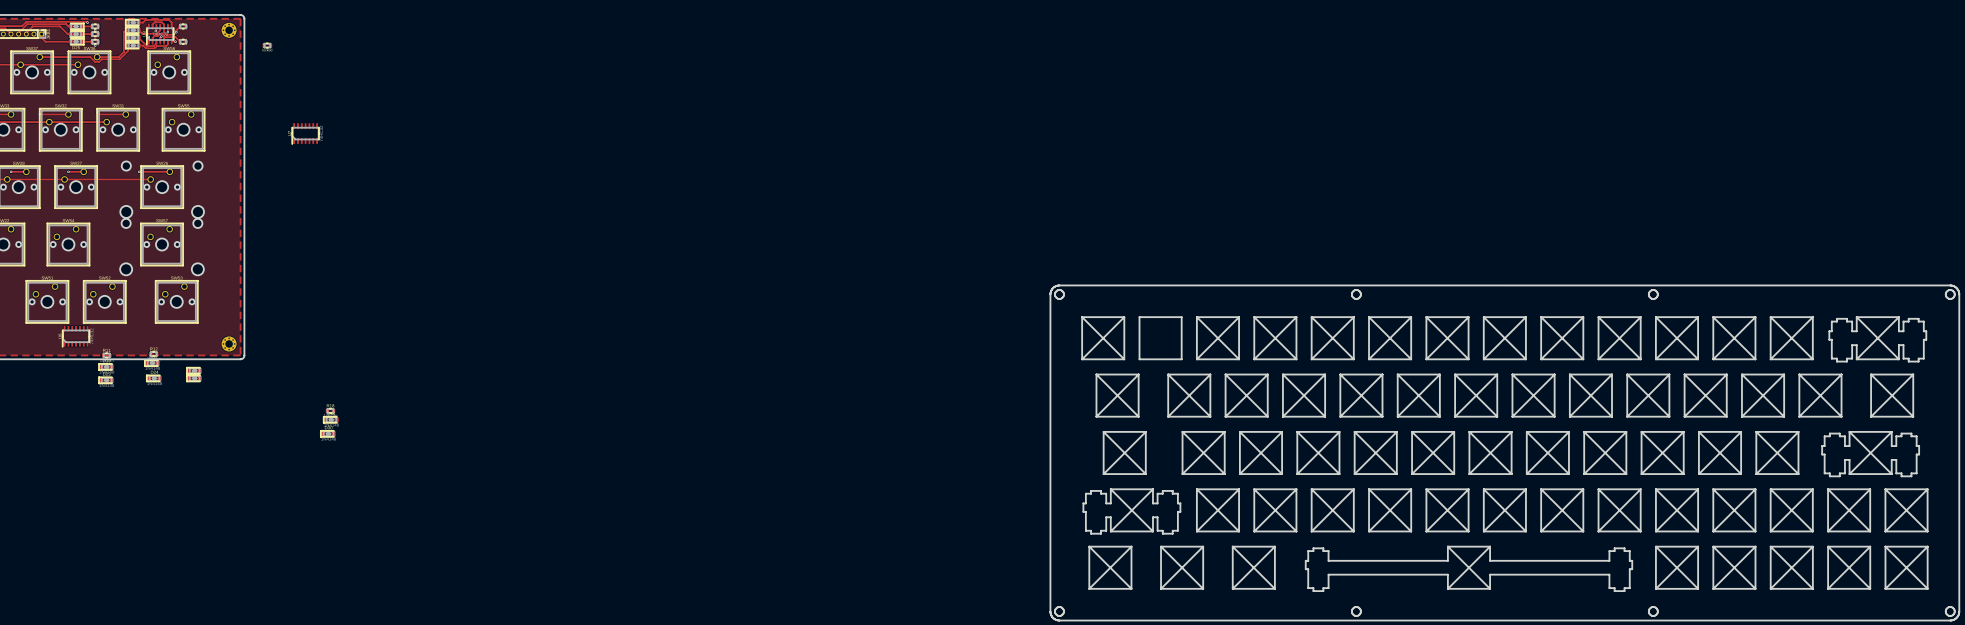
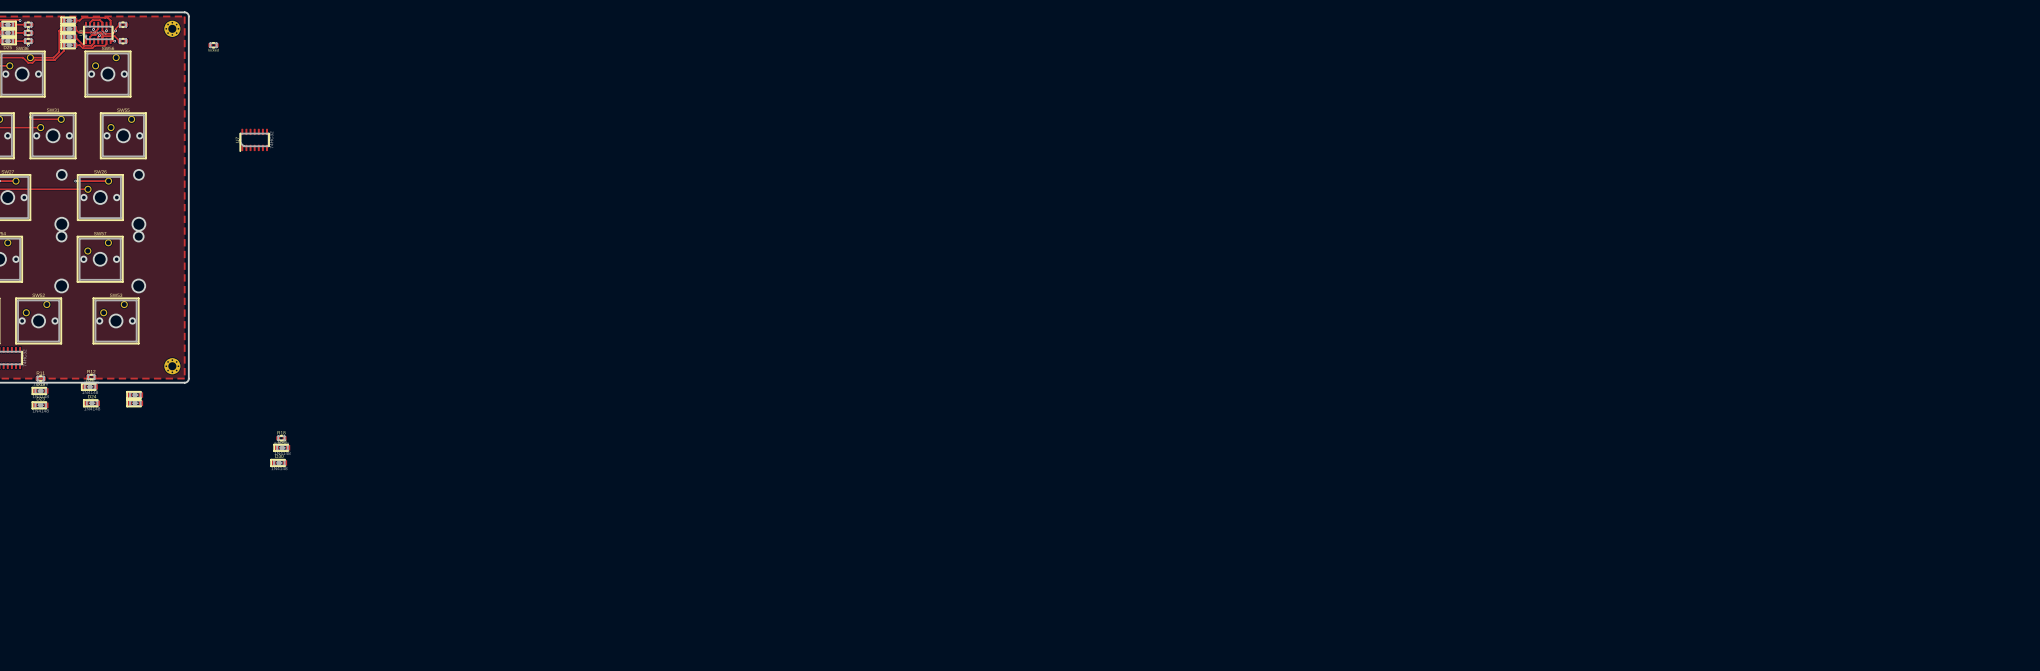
board edge: (1059, 285) (1053, 288) (1050, 294) (1050, 611) (1052, 616) (1056, 620) (1950, 620) (1955, 618) (1958, 614) (1959, 294) (1957, 289) (1953, 285) (1059, 285) -> none
board edge: (1059, 289) (1063, 294) (1059, 299) (1054, 294) (1059, 289) -> none
board edge: (1356, 289) (1351, 294) (1356, 299) (1360, 294) (1356, 289) -> none
board edge: (1653, 289) (1648, 294) (1653, 299) (1657, 294) (1653, 289) -> none
board edge: (1950, 289) (1945, 294) (1950, 299) (1954, 294) (1950, 289) -> none
board edge: (1082, 317) (1124, 317) -> none
board edge: (1082, 317) (1082, 359) -> none
board edge: (1082, 317) (1124, 359) -> none
board edge: (1124, 317) (1124, 359) -> none
board edge: (1124, 317) (1082, 359) -> none
board edge: (1139, 317) (1181, 317) (1181, 359) (1139, 359) (1139, 317) -> none
board edge: (1196, 317) (1239, 317) -> none
board edge: (1196, 317) (1196, 359) -> none
board edge: (1196, 317) (1239, 359) -> none
board edge: (1239, 317) (1239, 359) -> none
board edge: (1239, 317) (1196, 359) -> none
board edge: (1254, 317) (1296, 317) -> none
board edge: (1254, 317) (1254, 359) -> none
board edge: (1254, 317) (1296, 359) -> none
board edge: (1296, 317) (1296, 359) -> none
board edge: (1296, 317) (1254, 359) -> none
board edge: (1311, 317) (1353, 317) -> none
board edge: (1311, 317) (1311, 359) -> none
board edge: (1311, 317) (1353, 359) -> none
board edge: (1353, 317) (1353, 359) -> none
board edge: (1353, 317) (1311, 359) -> none
board edge: (1369, 317) (1411, 317) -> none
board edge: (1369, 317) (1369, 359) -> none
board edge: (1369, 317) (1411, 359) -> none
board edge: (1411, 317) (1411, 359) -> none
board edge: (1411, 317) (1369, 359) -> none
board edge: (1426, 317) (1468, 317) -> none
board edge: (1426, 317) (1426, 359) -> none
board edge: (1426, 317) (1468, 359) -> none
board edge: (1468, 317) (1468, 359) -> none
board edge: (1468, 317) (1426, 359) -> none
board edge: (1483, 317) (1525, 317) -> none
board edge: (1483, 317) (1483, 359) -> none
board edge: (1483, 317) (1525, 359) -> none
board edge: (1525, 317) (1525, 359) -> none
board edge: (1525, 317) (1483, 359) -> none
board edge: (1541, 317) (1583, 317) -> none
board edge: (1541, 317) (1541, 359) -> none
board edge: (1541, 317) (1583, 359) -> none
board edge: (1583, 317) (1583, 359) -> none
board edge: (1583, 317) (1541, 359) -> none
board edge: (1598, 317) (1598, 359) -> none
board edge: (1598, 317) (1640, 317) -> none
board edge: (1598, 317) (1640, 359) -> none
board edge: (1640, 317) (1640, 359) -> none
board edge: (1640, 317) (1598, 359) -> none
board edge: (1655, 317) (1698, 317) -> none
board edge: (1655, 317) (1655, 359) -> none
board edge: (1655, 317) (1698, 359) -> none
board edge: (1698, 317) (1698, 359) -> none
board edge: (1698, 317) (1655, 359) -> none
board edge: (1713, 317) (1713, 359) -> none
board edge: (1713, 317) (1755, 317) -> none
board edge: (1713, 317) (1755, 359) -> none
board edge: (1755, 317) (1755, 359) -> none
board edge: (1755, 317) (1713, 359) -> none
board edge: (1770, 317) (1770, 359) -> none
board edge: (1770, 317) (1812, 317) -> none
board edge: (1770, 317) (1812, 359) -> none
board edge: (1812, 317) (1812, 359) -> none
board edge: (1812, 317) (1770, 359) -> none
board edge: (1856, 317) (1898, 317) -> none
board edge: (1856, 317) (1856, 331) (1852, 331) (1852, 321) (1846, 321) (1846, 318) (1837, 318) (1837, 321) (1831, 321) (1831, 331) (1829, 331) (1829, 339) (1831, 339) (1831, 358) (1837, 358) (1837, 361) (1846, 361) (1846, 358) (1852, 358) (1852, 345) (1856, 345) (1856, 359) -> none
board edge: (1856, 317) (1898, 359) -> none
board edge: (1898, 317) (1898, 331) (1903, 331) (1903, 321) (1908, 321) (1908, 318) (1918, 318) (1918, 321) (1923, 321) (1923, 331) (1926, 331) (1926, 339) (1923, 339) (1923, 358) (1918, 358) (1918, 361) (1908, 361) (1908, 358) (1903, 358) (1903, 345) (1898, 345) (1898, 359) -> none
board edge: (1898, 317) (1856, 359) -> none
board edge: (1082, 359) (1124, 359) -> none
board edge: (1196, 359) (1239, 359) -> none
board edge: (1254, 359) (1296, 359) -> none
board edge: (1311, 359) (1353, 359) -> none
board edge: (1369, 359) (1411, 359) -> none
board edge: (1426, 359) (1468, 359) -> none
board edge: (1483, 359) (1525, 359) -> none
board edge: (1541, 359) (1583, 359) -> none
board edge: (1598, 359) (1640, 359) -> none
board edge: (1655, 359) (1698, 359) -> none
board edge: (1713, 359) (1755, 359) -> none
board edge: (1770, 359) (1812, 359) -> none
board edge: (1856, 359) (1898, 359) -> none
board edge: (1096, 374) (1138, 374) -> none
board edge: (1096, 374) (1096, 416) -> none
board edge: (1096, 374) (1138, 416) -> none
board edge: (1138, 374) (1138, 416) -> none
board edge: (1138, 374) (1096, 416) -> none
board edge: (1168, 374) (1210, 374) -> none
board edge: (1168, 374) (1168, 416) -> none
board edge: (1168, 374) (1210, 416) -> none
board edge: (1210, 374) (1210, 416) -> none
board edge: (1210, 374) (1168, 416) -> none
board edge: (1225, 374) (1267, 374) -> none
board edge: (1225, 374) (1225, 416) -> none
board edge: (1225, 374) (1267, 416) -> none
board edge: (1267, 374) (1267, 416) -> none
board edge: (1267, 374) (1225, 416) -> none
board edge: (1282, 374) (1325, 374) -> none
board edge: (1282, 374) (1282, 416) -> none
board edge: (1282, 374) (1325, 416) -> none
board edge: (1325, 374) (1325, 416) -> none
board edge: (1325, 374) (1282, 416) -> none
board edge: (1340, 374) (1382, 374) -> none
board edge: (1340, 374) (1340, 416) -> none
board edge: (1340, 374) (1382, 416) -> none
board edge: (1382, 374) (1382, 416) -> none
board edge: (1382, 374) (1340, 416) -> none
board edge: (1397, 374) (1439, 374) -> none
board edge: (1397, 374) (1397, 416) -> none
board edge: (1397, 374) (1439, 416) -> none
board edge: (1439, 374) (1439, 416) -> none
board edge: (1439, 374) (1397, 416) -> none
board edge: (1455, 374) (1497, 374) -> none
board edge: (1455, 374) (1455, 416) -> none
board edge: (1455, 374) (1497, 416) -> none
board edge: (1497, 374) (1497, 416) -> none
board edge: (1497, 374) (1455, 416) -> none
board edge: (1512, 374) (1554, 374) -> none
board edge: (1512, 374) (1512, 416) -> none
board edge: (1512, 374) (1554, 416) -> none
board edge: (1554, 374) (1554, 416) -> none
board edge: (1554, 374) (1512, 416) -> none
board edge: (1569, 374) (1612, 374) -> none
board edge: (1569, 374) (1569, 416) -> none
board edge: (1569, 374) (1612, 416) -> none
board edge: (1612, 374) (1612, 416) -> none
board edge: (1612, 374) (1569, 416) -> none
board edge: (1627, 374) (1669, 374) -> none
board edge: (1627, 374) (1627, 416) -> none
board edge: (1627, 374) (1669, 416) -> none
board edge: (1669, 374) (1669, 416) -> none
board edge: (1669, 374) (1627, 416) -> none
board edge: (1684, 374) (1726, 374) -> none
board edge: (1684, 374) (1684, 416) -> none
board edge: (1684, 374) (1726, 416) -> none
board edge: (1726, 374) (1726, 416) -> none
board edge: (1726, 374) (1684, 416) -> none
board edge: (1741, 374) (1784, 374) -> none
board edge: (1741, 374) (1741, 416) -> none
board edge: (1741, 374) (1784, 416) -> none
board edge: (1784, 374) (1784, 416) -> none
board edge: (1784, 374) (1741, 416) -> none
board edge: (1799, 374) (1841, 374) -> none
board edge: (1799, 374) (1799, 416) -> none
board edge: (1799, 374) (1841, 416) -> none
board edge: (1841, 374) (1841, 416) -> none
board edge: (1841, 374) (1799, 416) -> none
board edge: (1871, 374) (1913, 374) -> none
board edge: (1871, 374) (1871, 416) -> none
board edge: (1871, 374) (1913, 416) -> none
board edge: (1913, 374) (1913, 416) -> none
board edge: (1913, 374) (1871, 416) -> none
board edge: (1096, 416) (1138, 416) -> none
board edge: (1168, 416) (1210, 416) -> none
board edge: (1225, 416) (1267, 416) -> none
board edge: (1282, 416) (1325, 416) -> none
board edge: (1340, 416) (1382, 416) -> none
board edge: (1397, 416) (1439, 416) -> none
board edge: (1455, 416) (1497, 416) -> none
board edge: (1512, 416) (1554, 416) -> none
board edge: (1569, 416) (1612, 416) -> none
board edge: (1627, 416) (1669, 416) -> none
board edge: (1684, 416) (1726, 416) -> none
board edge: (1741, 416) (1784, 416) -> none
board edge: (1799, 416) (1841, 416) -> none
board edge: (1871, 416) (1913, 416) -> none
board edge: (1103, 431) (1145, 431) -> none
board edge: (1103, 431) (1103, 474) -> none
board edge: (1103, 431) (1145, 474) -> none
board edge: (1145, 431) (1145, 474) -> none
board edge: (1145, 431) (1103, 474) -> none
board edge: (1182, 431) (1224, 431) -> none
board edge: (1182, 431) (1182, 474) -> none
board edge: (1182, 431) (1224, 474) -> none
board edge: (1224, 431) (1224, 474) -> none
board edge: (1224, 431) (1182, 474) -> none
board edge: (1239, 431) (1282, 431) -> none
board edge: (1239, 431) (1239, 474) -> none
board edge: (1239, 431) (1282, 474) -> none
board edge: (1282, 431) (1282, 474) -> none
board edge: (1282, 431) (1239, 474) -> none
board edge: (1297, 431) (1339, 431) -> none
board edge: (1297, 431) (1297, 474) -> none
board edge: (1297, 431) (1339, 474) -> none
board edge: (1339, 431) (1339, 474) -> none
board edge: (1339, 431) (1297, 474) -> none
board edge: (1354, 431) (1396, 431) -> none
board edge: (1354, 431) (1354, 474) -> none
board edge: (1354, 431) (1396, 474) -> none
board edge: (1396, 431) (1396, 474) -> none
board edge: (1396, 431) (1354, 474) -> none
board edge: (1412, 431) (1454, 431) -> none
board edge: (1412, 431) (1412, 474) -> none
board edge: (1412, 431) (1454, 474) -> none
board edge: (1454, 431) (1454, 474) -> none
board edge: (1454, 431) (1412, 474) -> none
board edge: (1469, 431) (1511, 431) -> none
board edge: (1469, 431) (1469, 474) -> none
board edge: (1469, 431) (1511, 474) -> none
board edge: (1511, 431) (1511, 474) -> none
board edge: (1511, 431) (1469, 474) -> none
board edge: (1526, 431) (1568, 431) -> none
board edge: (1526, 431) (1526, 474) -> none
board edge: (1526, 431) (1568, 474) -> none
board edge: (1568, 431) (1568, 474) -> none
board edge: (1568, 431) (1526, 474) -> none
board edge: (1584, 431) (1626, 431) -> none
board edge: (1584, 431) (1584, 474) -> none
board edge: (1584, 431) (1626, 474) -> none
board edge: (1626, 431) (1626, 474) -> none
board edge: (1626, 431) (1584, 474) -> none
board edge: (1641, 431) (1683, 431) -> none
board edge: (1641, 431) (1641, 474) -> none
board edge: (1641, 431) (1683, 474) -> none
board edge: (1683, 431) (1683, 474) -> none
board edge: (1683, 431) (1641, 474) -> none
board edge: (1698, 431) (1741, 431) -> none
board edge: (1698, 431) (1698, 474) -> none
board edge: (1698, 431) (1741, 474) -> none
board edge: (1741, 431) (1741, 474) -> none
board edge: (1741, 431) (1698, 474) -> none
board edge: (1756, 431) (1798, 431) -> none
board edge: (1756, 431) (1756, 474) -> none
board edge: (1756, 431) (1798, 474) -> none
board edge: (1798, 431) (1798, 474) -> none
board edge: (1798, 431) (1756, 474) -> none
board edge: (1849, 431) (1891, 431) -> none
board edge: (1849, 431) (1849, 446) (1844, 446) (1844, 436) (1839, 436) (1839, 433) (1829, 433) (1829, 436) (1824, 436) (1824, 446) (1822, 446) (1822, 454) (1824, 454) (1824, 473) (1829, 473) (1829, 476) (1839, 476) (1839, 473) (1844, 473) (1844, 459) (1849, 459) (1849, 474) -> none
board edge: (1849, 431) (1891, 474) -> none
board edge: (1891, 431) (1891, 446) (1896, 446) (1896, 436) (1901, 436) (1901, 433) (1911, 433) (1911, 436) (1916, 436) (1916, 446) (1919, 446) (1919, 454) (1916, 454) (1916, 473) (1911, 473) (1911, 476) (1901, 476) (1901, 473) (1896, 473) (1896, 459) (1891, 459) (1891, 474) -> none
board edge: (1891, 431) (1849, 474) -> none
board edge: (1103, 474) (1145, 474) -> none
board edge: (1182, 474) (1224, 474) -> none
board edge: (1239, 474) (1282, 474) -> none
board edge: (1297, 474) (1339, 474) -> none
board edge: (1354, 474) (1396, 474) -> none
board edge: (1412, 474) (1454, 474) -> none
board edge: (1469, 474) (1511, 474) -> none
board edge: (1526, 474) (1568, 474) -> none
board edge: (1584, 474) (1626, 474) -> none
board edge: (1641, 474) (1683, 474) -> none
board edge: (1698, 474) (1741, 474) -> none
board edge: (1756, 474) (1798, 474) -> none
board edge: (1849, 474) (1891, 474) -> none
board edge: (1110, 489) (1152, 489) -> none
board edge: (1110, 489) (1110, 503) (1106, 503) (1106, 493) (1101, 493) (1101, 490) (1091, 490) (1091, 493) (1085, 493) (1085, 503) (1083, 503) (1083, 511) (1085, 511) (1085, 530) (1091, 530) (1091, 533) (1101, 533) (1101, 530) (1106, 530) (1106, 517) (1110, 517) (1110, 531) -> none
board edge: (1110, 489) (1152, 531) -> none
board edge: (1152, 489) (1152, 503) (1157, 503) (1157, 493) (1162, 493) (1162, 490) (1172, 490) (1172, 493) (1177, 493) (1177, 503) (1180, 503) (1180, 511) (1177, 511) (1177, 530) (1172, 530) (1172, 533) (1162, 533) (1162, 530) (1157, 530) (1157, 517) (1152, 517) (1152, 531) -> none
board edge: (1152, 489) (1110, 531) -> none
board edge: (1196, 489) (1239, 489) -> none
board edge: (1196, 489) (1196, 531) -> none
board edge: (1196, 489) (1239, 531) -> none
board edge: (1239, 489) (1239, 531) -> none
board edge: (1239, 489) (1196, 531) -> none
board edge: (1254, 489) (1296, 489) -> none
board edge: (1254, 489) (1254, 531) -> none
board edge: (1254, 489) (1296, 531) -> none
board edge: (1296, 489) (1296, 531) -> none
board edge: (1296, 489) (1254, 531) -> none
board edge: (1311, 489) (1353, 489) -> none
board edge: (1311, 489) (1311, 531) -> none
board edge: (1311, 489) (1353, 531) -> none
board edge: (1353, 489) (1353, 531) -> none
board edge: (1353, 489) (1311, 531) -> none
board edge: (1369, 489) (1411, 489) -> none
board edge: (1369, 489) (1369, 531) -> none
board edge: (1369, 489) (1411, 531) -> none
board edge: (1411, 489) (1411, 531) -> none
board edge: (1411, 489) (1369, 531) -> none
board edge: (1426, 489) (1468, 489) -> none
board edge: (1426, 489) (1426, 531) -> none
board edge: (1426, 489) (1468, 531) -> none
board edge: (1468, 489) (1468, 531) -> none
board edge: (1468, 489) (1426, 531) -> none
board edge: (1483, 489) (1525, 489) -> none
board edge: (1483, 489) (1483, 531) -> none
board edge: (1483, 489) (1525, 531) -> none
board edge: (1525, 489) (1525, 531) -> none
board edge: (1525, 489) (1483, 531) -> none
board edge: (1541, 489) (1583, 489) -> none
board edge: (1541, 489) (1541, 531) -> none
board edge: (1541, 489) (1583, 531) -> none
board edge: (1583, 489) (1583, 531) -> none
board edge: (1583, 489) (1541, 531) -> none
board edge: (1598, 489) (1598, 531) -> none
board edge: (1598, 489) (1640, 489) -> none
board edge: (1598, 489) (1640, 531) -> none
board edge: (1640, 489) (1640, 531) -> none
board edge: (1640, 489) (1598, 531) -> none
board edge: (1655, 489) (1655, 531) -> none
board edge: (1655, 489) (1698, 489) -> none
board edge: (1655, 489) (1698, 531) -> none
board edge: (1698, 489) (1698, 531) -> none
board edge: (1698, 489) (1655, 531) -> none
board edge: (1713, 489) (1713, 531) -> none
board edge: (1713, 489) (1755, 489) -> none
board edge: (1713, 489) (1755, 531) -> none
board edge: (1755, 489) (1755, 531) -> none
board edge: (1755, 489) (1713, 531) -> none
board edge: (1770, 489) (1770, 531) -> none
board edge: (1770, 489) (1812, 489) -> none
board edge: (1770, 489) (1812, 531) -> none
board edge: (1812, 489) (1812, 531) -> none
board edge: (1812, 489) (1770, 531) -> none
board edge: (1828, 489) (1870, 489) -> none
board edge: (1828, 489) (1828, 531) -> none
board edge: (1828, 489) (1870, 531) -> none
board edge: (1870, 489) (1870, 531) -> none
board edge: (1870, 489) (1828, 531) -> none
board edge: (1885, 489) (1927, 489) -> none
board edge: (1885, 489) (1885, 531) -> none
board edge: (1885, 489) (1927, 531) -> none
board edge: (1927, 489) (1927, 531) -> none
board edge: (1927, 489) (1885, 531) -> none
board edge: (1110, 531) (1152, 531) -> none
board edge: (1196, 531) (1239, 531) -> none
board edge: (1254, 531) (1296, 531) -> none
board edge: (1311, 531) (1353, 531) -> none
board edge: (1369, 531) (1411, 531) -> none
board edge: (1426, 531) (1468, 531) -> none
board edge: (1483, 531) (1525, 531) -> none
board edge: (1541, 531) (1583, 531) -> none
board edge: (1598, 531) (1640, 531) -> none
board edge: (1655, 531) (1698, 531) -> none
board edge: (1713, 531) (1755, 531) -> none
board edge: (1770, 531) (1812, 531) -> none
board edge: (1828, 531) (1870, 531) -> none
board edge: (1885, 531) (1927, 531) -> none
board edge: (1089, 546) (1131, 546) -> none
board edge: (1089, 546) (1089, 588) -> none
board edge: (1089, 546) (1131, 588) -> none
board edge: (1131, 546) (1131, 588) -> none
board edge: (1131, 546) (1089, 588) -> none
board edge: (1161, 546) (1203, 546) -> none
board edge: (1161, 546) (1161, 588) -> none
board edge: (1161, 546) (1203, 588) -> none
board edge: (1203, 546) (1203, 588) -> none
board edge: (1203, 546) (1161, 588) -> none
board edge: (1232, 546) (1274, 546) -> none
board edge: (1232, 546) (1232, 588) -> none
board edge: (1232, 546) (1274, 588) -> none
board edge: (1274, 546) (1274, 588) -> none
board edge: (1274, 546) (1232, 588) -> none
board edge: (1447, 546) (1490, 546) -> none
board edge: (1447, 546) (1447, 560) (1328, 560) (1328, 551) (1323, 551) (1323, 548) (1313, 548) (1313, 551) (1308, 551) (1308, 560) (1305, 560) (1305, 569) (1308, 569) (1308, 588) (1313, 588) (1313, 591) (1323, 591) (1323, 588) (1328, 588) (1328, 574) (1447, 574) (1447, 588) -> none
board edge: (1447, 546) (1490, 588) -> none
board edge: (1490, 546) (1490, 560) (1609, 560) (1609, 551) (1614, 551) (1614, 548) (1624, 548) (1624, 551) (1629, 551) (1629, 560) (1632, 560) (1632, 569) (1629, 569) (1629, 588) (1624, 588) (1624, 591) (1614, 591) (1614, 588) (1609, 588) (1609, 574) (1490, 574) (1490, 588) -> none
board edge: (1490, 546) (1447, 588) -> none
board edge: (1655, 546) (1655, 588) -> none
board edge: (1655, 546) (1698, 546) -> none
board edge: (1655, 546) (1698, 588) -> none
board edge: (1698, 546) (1698, 588) -> none
board edge: (1698, 546) (1655, 588) -> none
board edge: (1713, 546) (1755, 546) -> none
board edge: (1713, 546) (1713, 588) -> none
board edge: (1713, 546) (1755, 588) -> none
board edge: (1755, 546) (1755, 588) -> none
board edge: (1755, 546) (1713, 588) -> none
board edge: (1770, 546) (1812, 546) -> none
board edge: (1770, 546) (1770, 588) -> none
board edge: (1770, 546) (1812, 588) -> none
board edge: (1812, 546) (1812, 588) -> none
board edge: (1812, 546) (1770, 588) -> none
board edge: (1828, 546) (1870, 546) -> none
board edge: (1828, 546) (1828, 588) -> none
board edge: (1828, 546) (1870, 588) -> none
board edge: (1870, 546) (1870, 588) -> none
board edge: (1870, 546) (1828, 588) -> none
board edge: (1885, 546) (1927, 546) -> none
board edge: (1885, 546) (1885, 588) -> none
board edge: (1885, 546) (1927, 588) -> none
board edge: (1927, 546) (1927, 588) -> none
board edge: (1927, 546) (1885, 588) -> none
board edge: (1089, 588) (1131, 588) -> none
board edge: (1161, 588) (1203, 588) -> none
board edge: (1232, 588) (1274, 588) -> none
board edge: (1447, 588) (1490, 588) -> none
board edge: (1655, 588) (1698, 588) -> none
board edge: (1713, 588) (1755, 588) -> none
board edge: (1770, 588) (1812, 588) -> none
board edge: (1828, 588) (1870, 588) -> none
board edge: (1885, 588) (1927, 588) -> none
board edge: (1059, 606) (1063, 611) (1059, 616) (1054, 611) (1059, 606) -> none
board edge: (1356, 606) (1351, 611) (1356, 616) (1360, 611) (1356, 606) -> none
board edge: (1653, 606) (1648, 611) (1653, 616) (1657, 611) (1653, 606) -> none
board edge: (1950, 606) (1945, 611) (1950, 616) (1954, 611) (1950, 606) -> none

